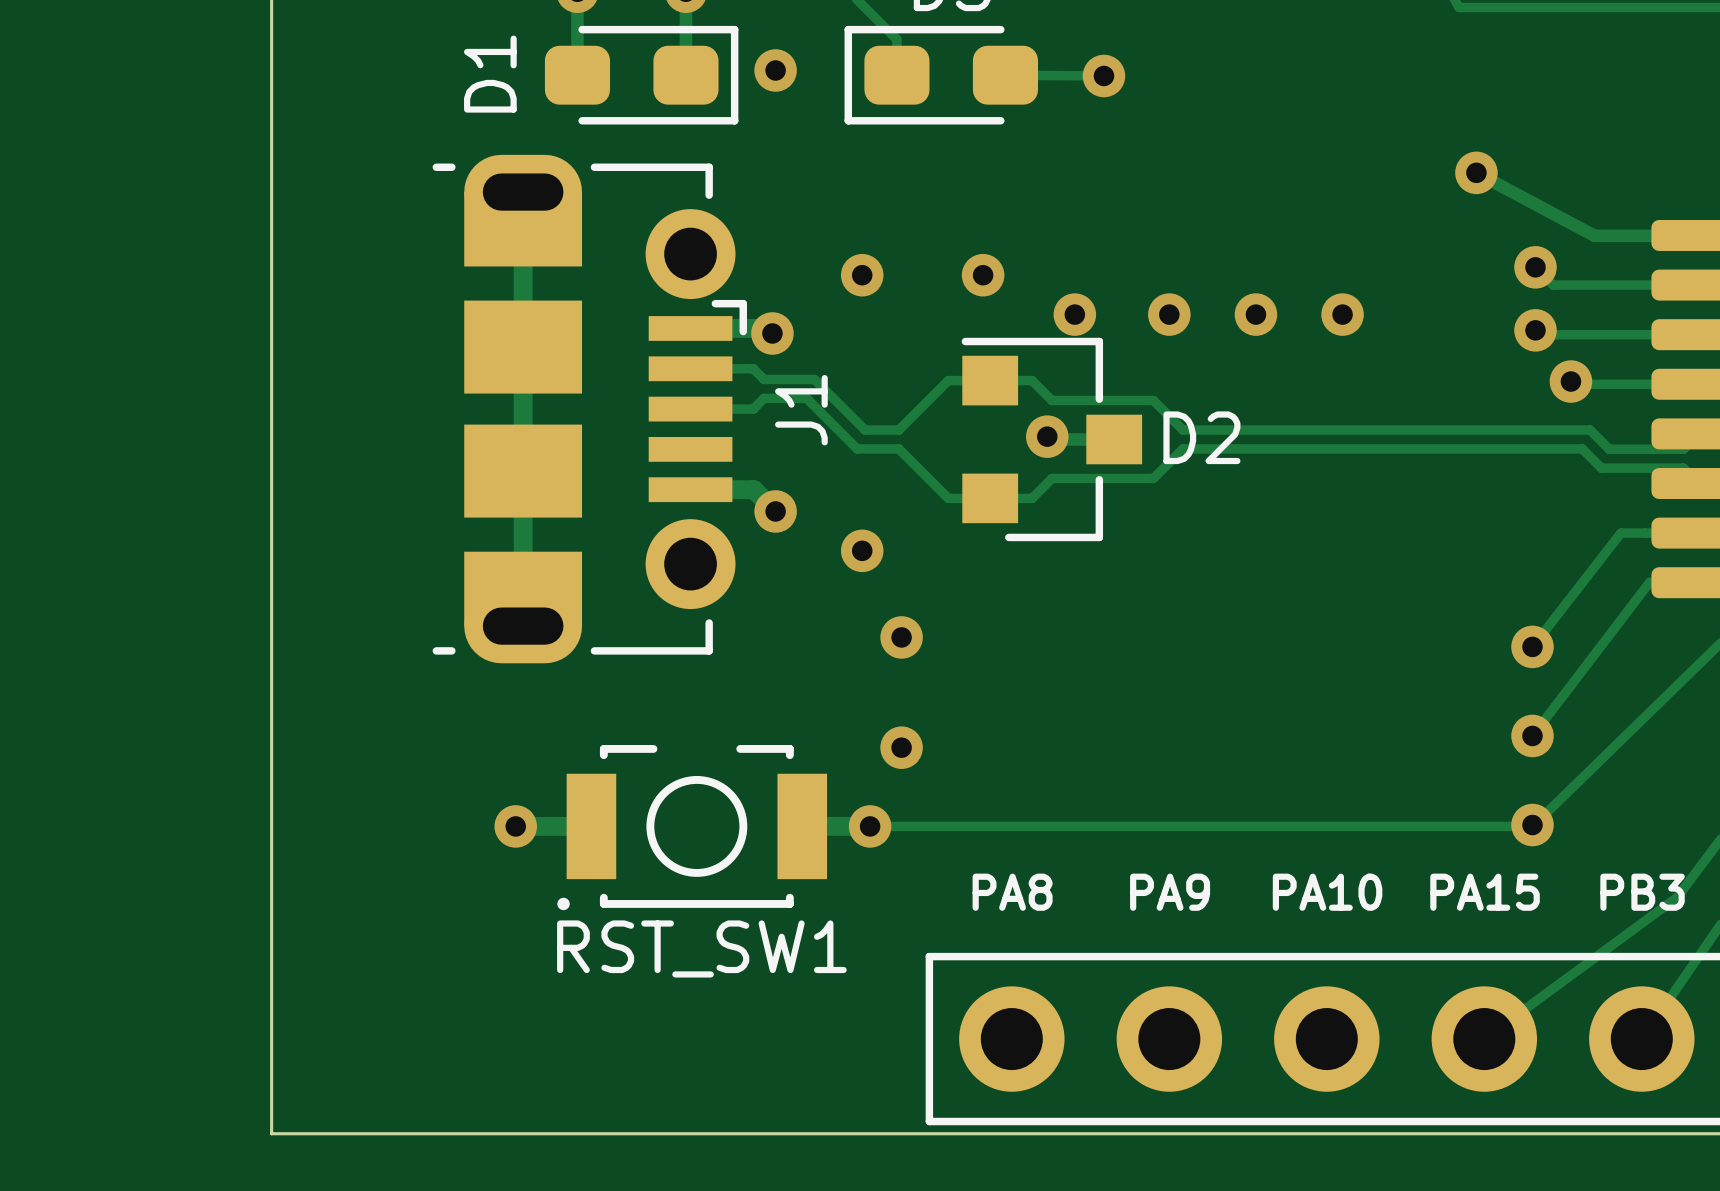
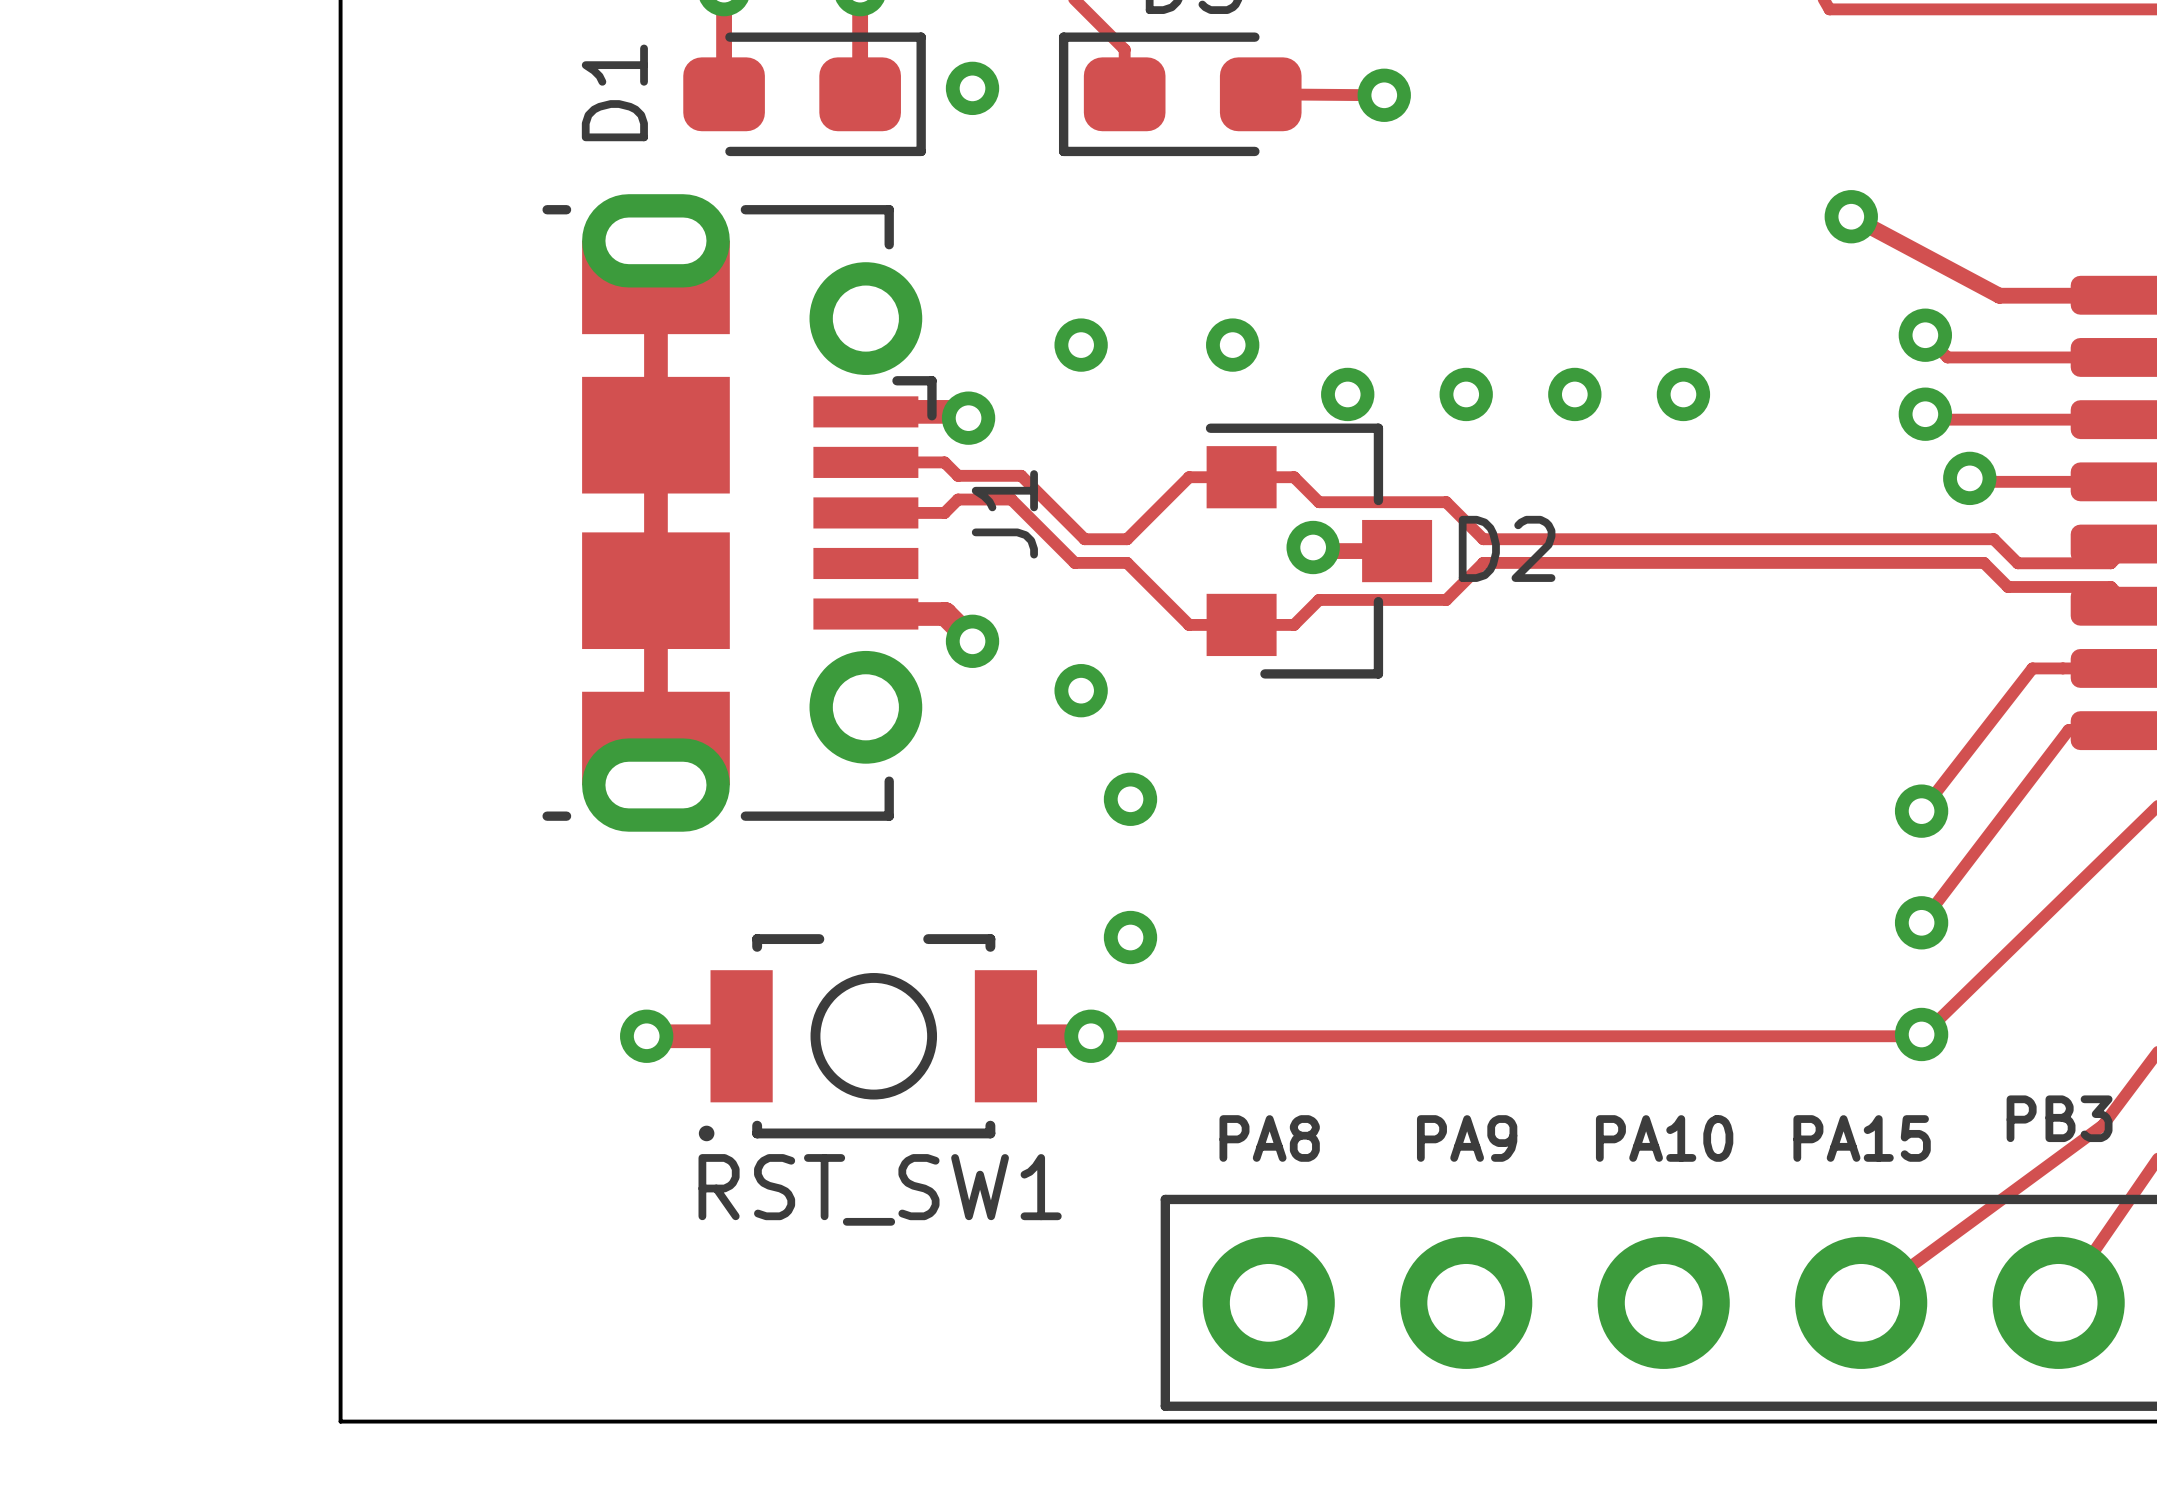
text position: PA8 (1012, 892) -> PA8 (1269, 1138)
text position: PA9 (1170, 892) -> PA9 (1467, 1138)
text position: PA10 (1327, 892) -> PA10 (1664, 1138)
text position: PA15 (1485, 892) -> PA15 (1862, 1138)

